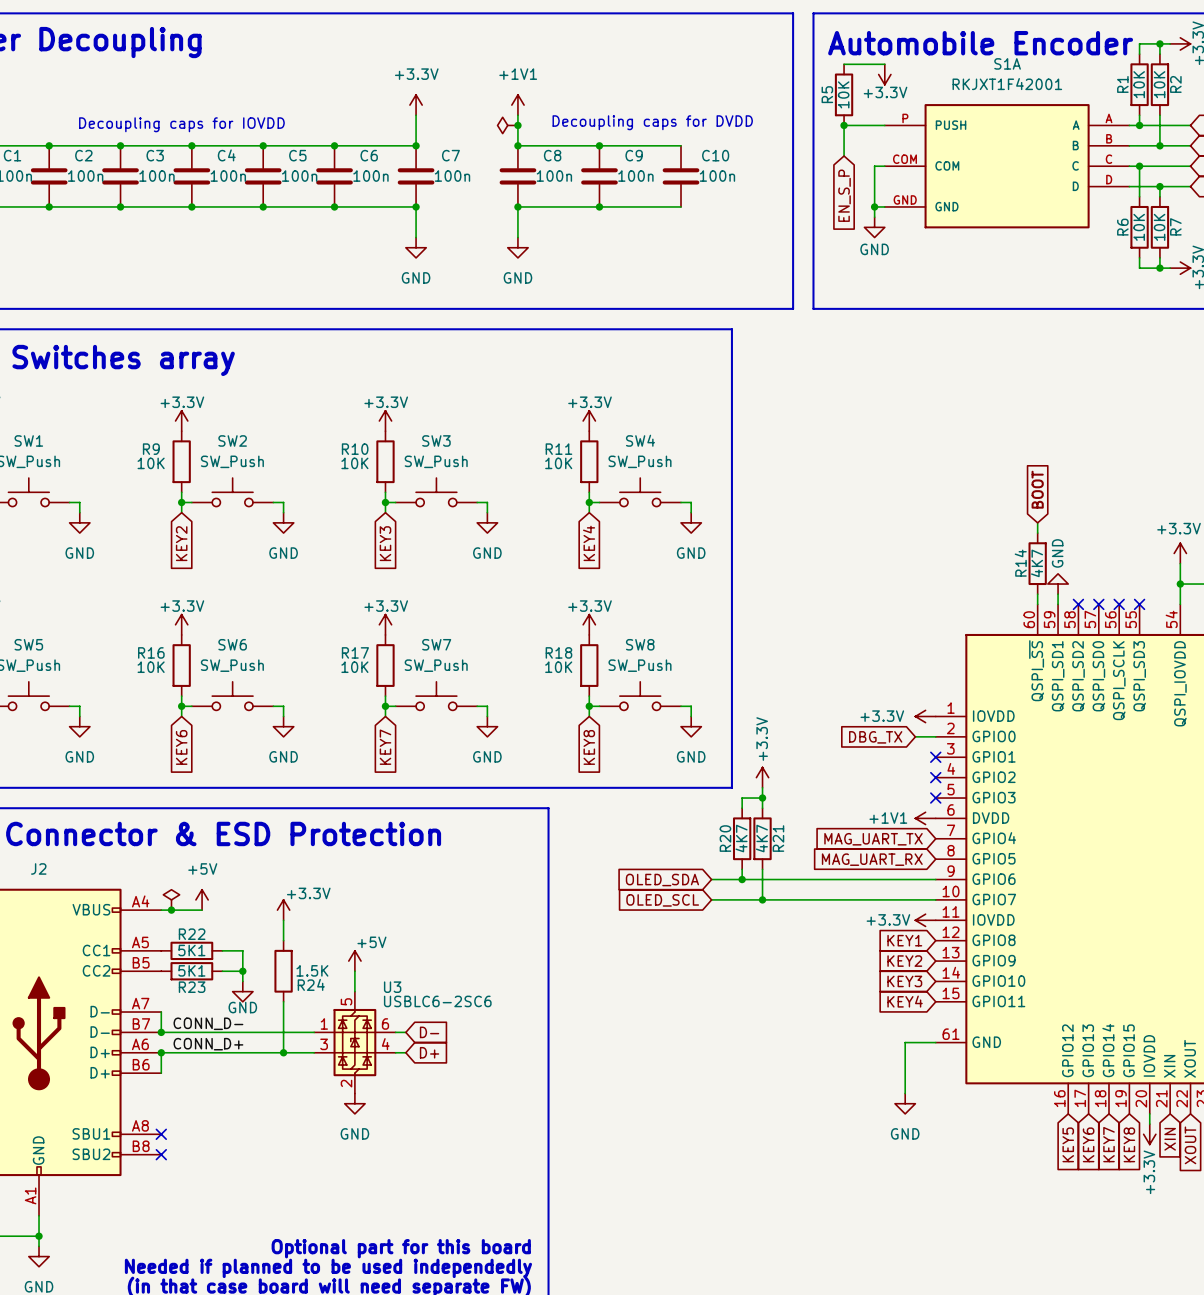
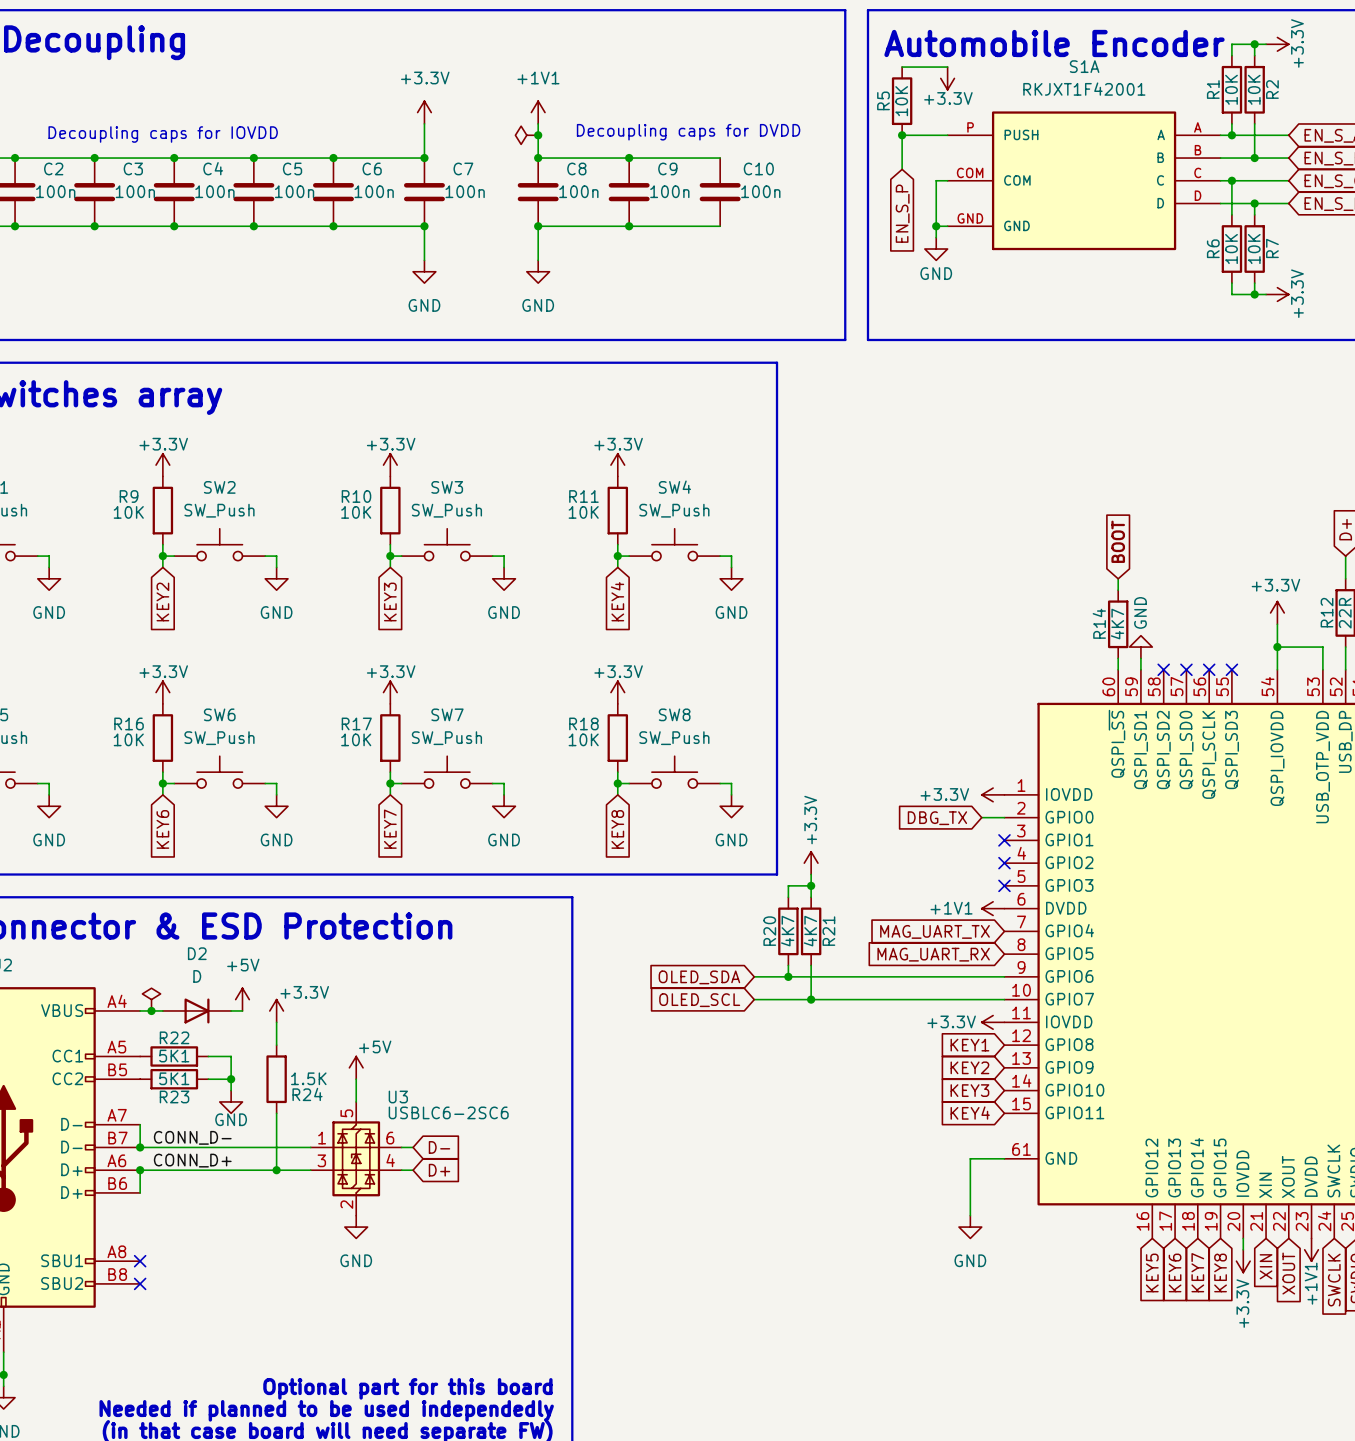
power symbol position: +5V (202, 899) -> +5V (242, 999)
D2: none -> D (197, 1010)
wire: none -> (231, 1010) (242, 1010)

